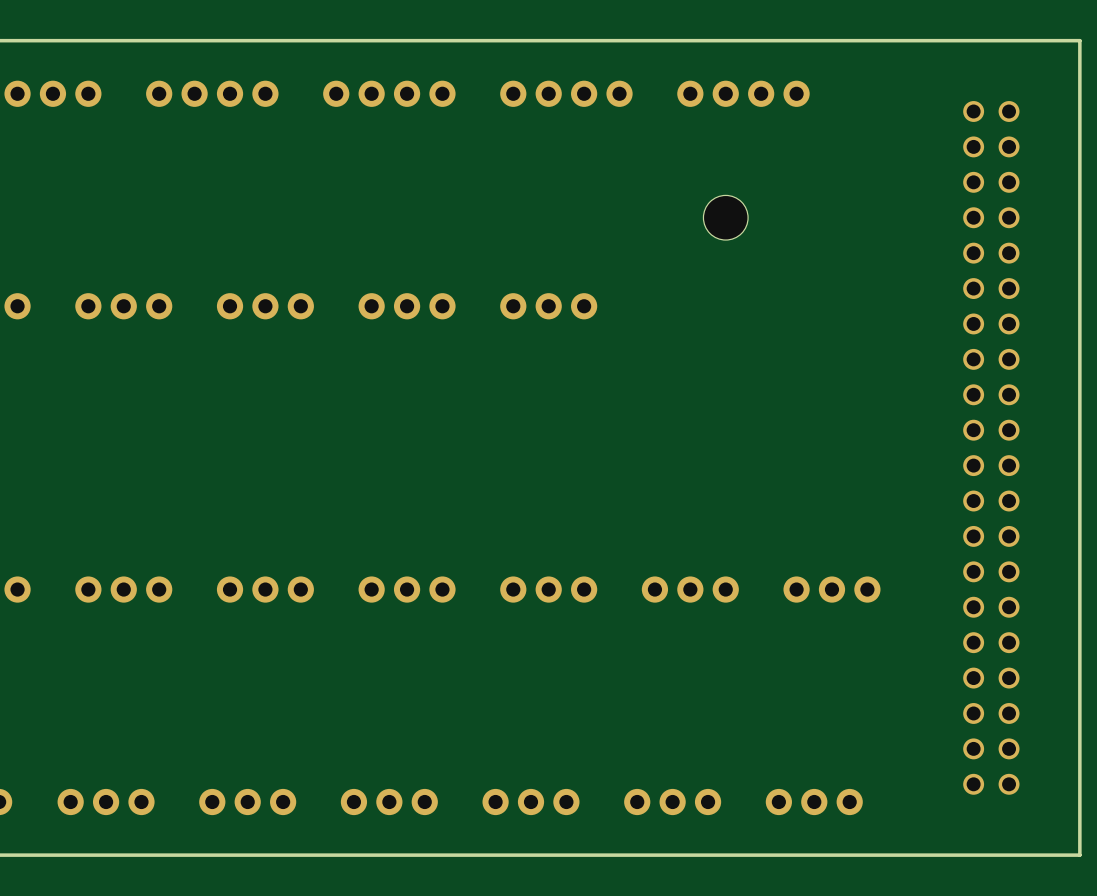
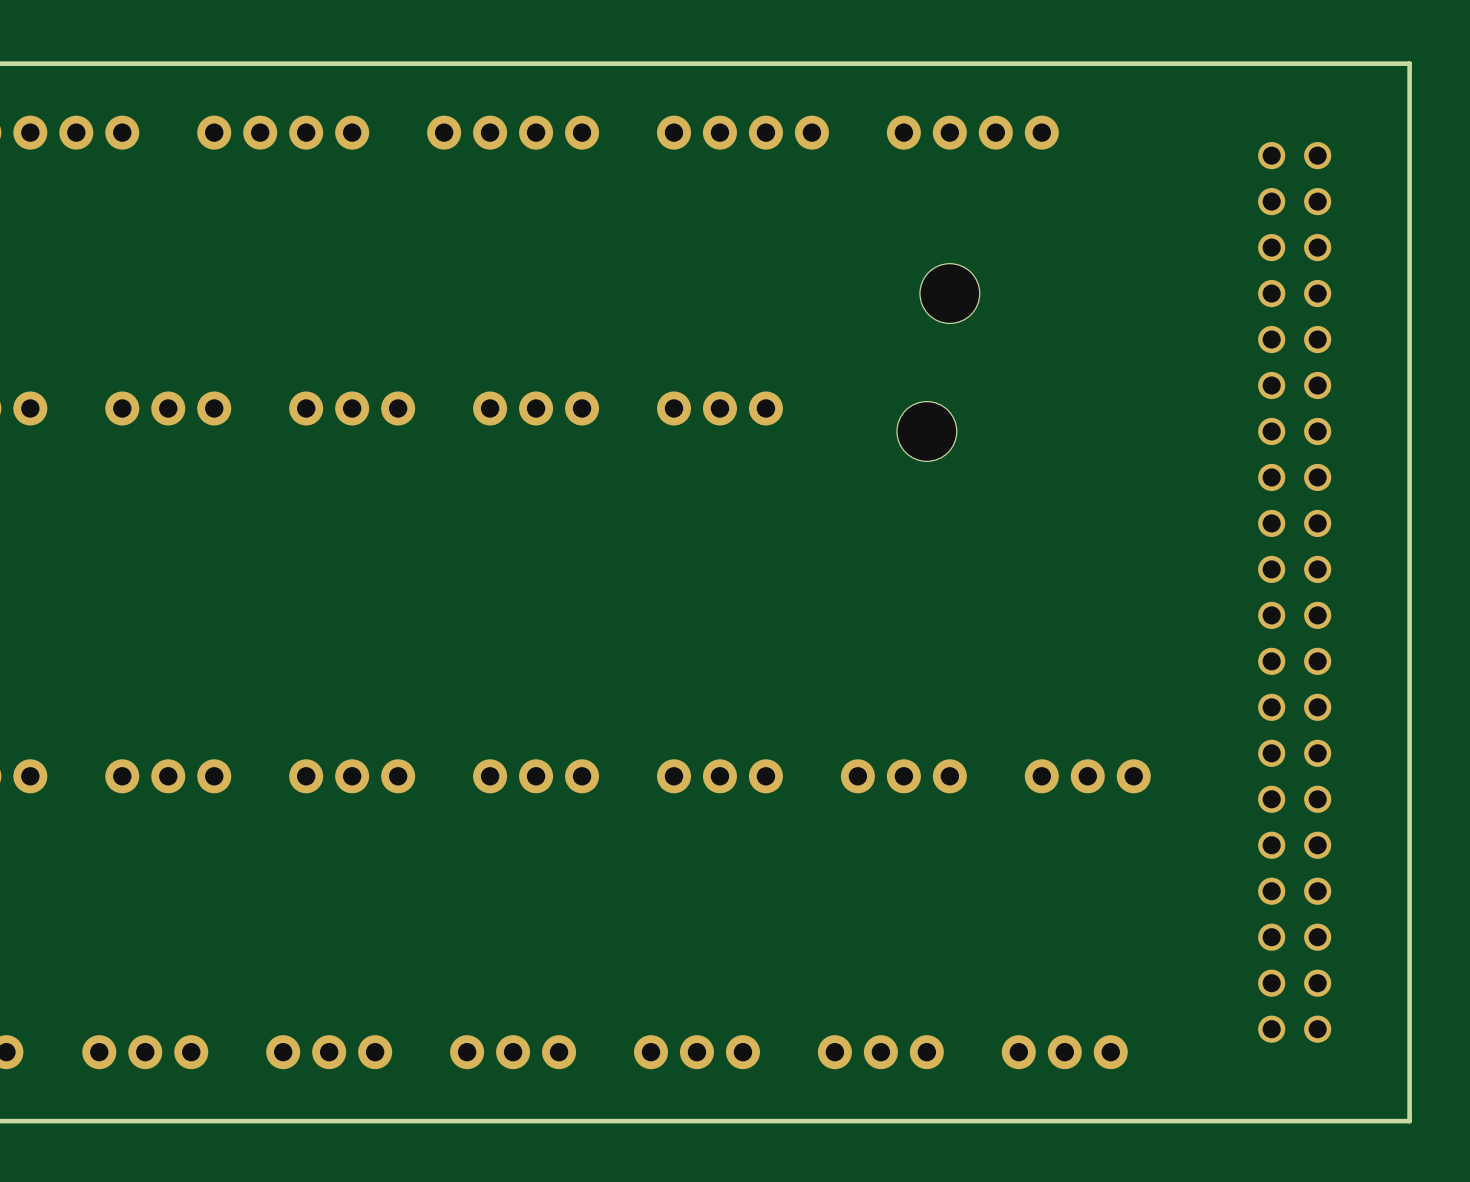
hole: (725, 217) -> none
part: none -> (949, 293)
part: none -> (926, 431)

